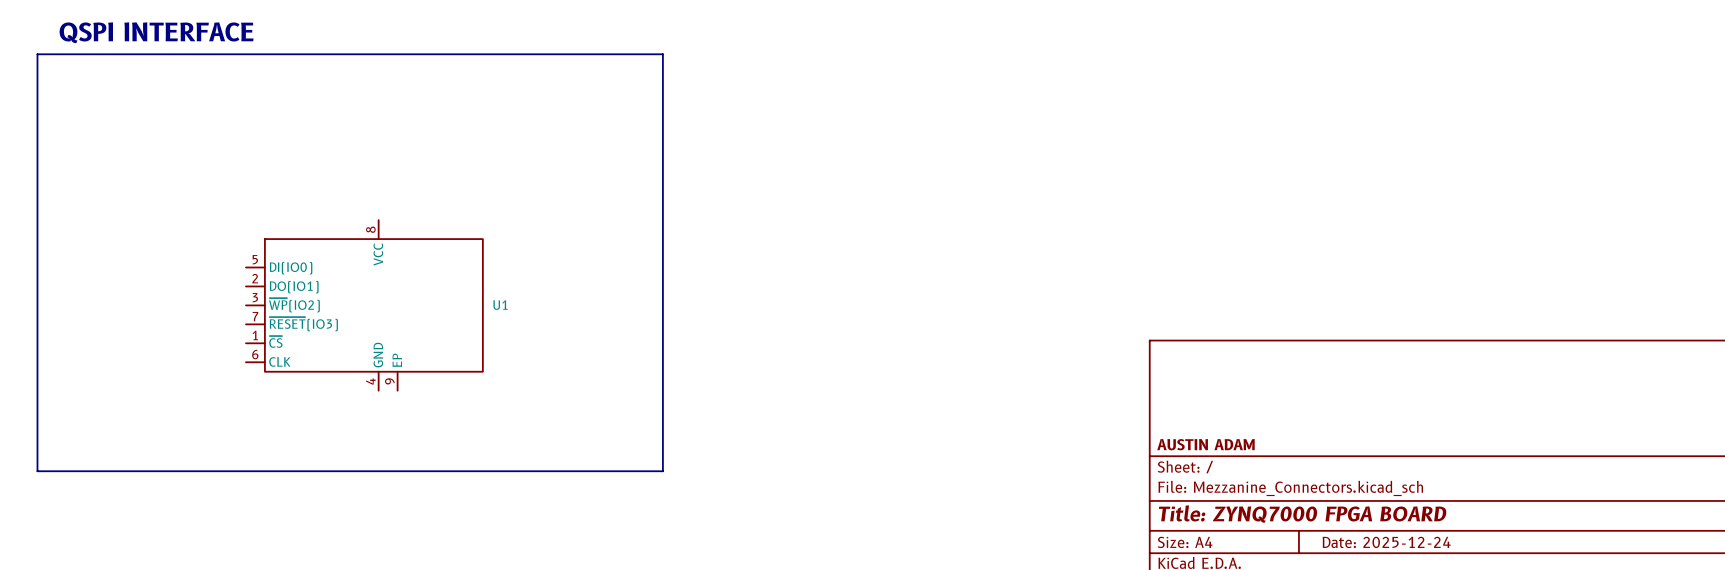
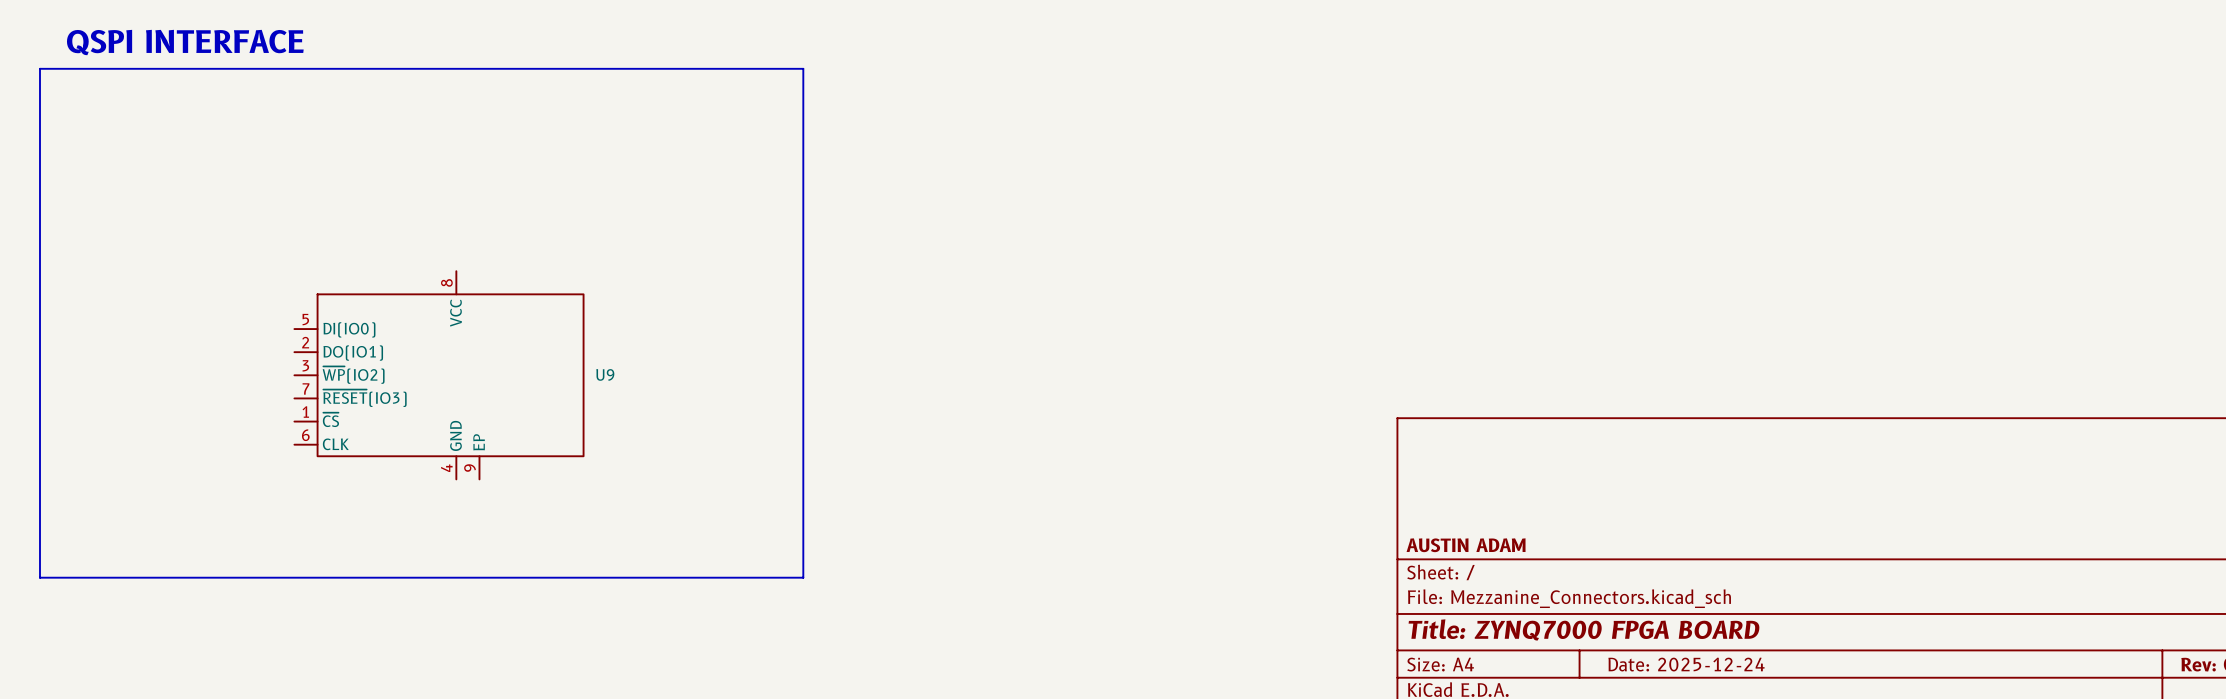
U1 name: U1 (500, 305) -> U9 (605, 374)

